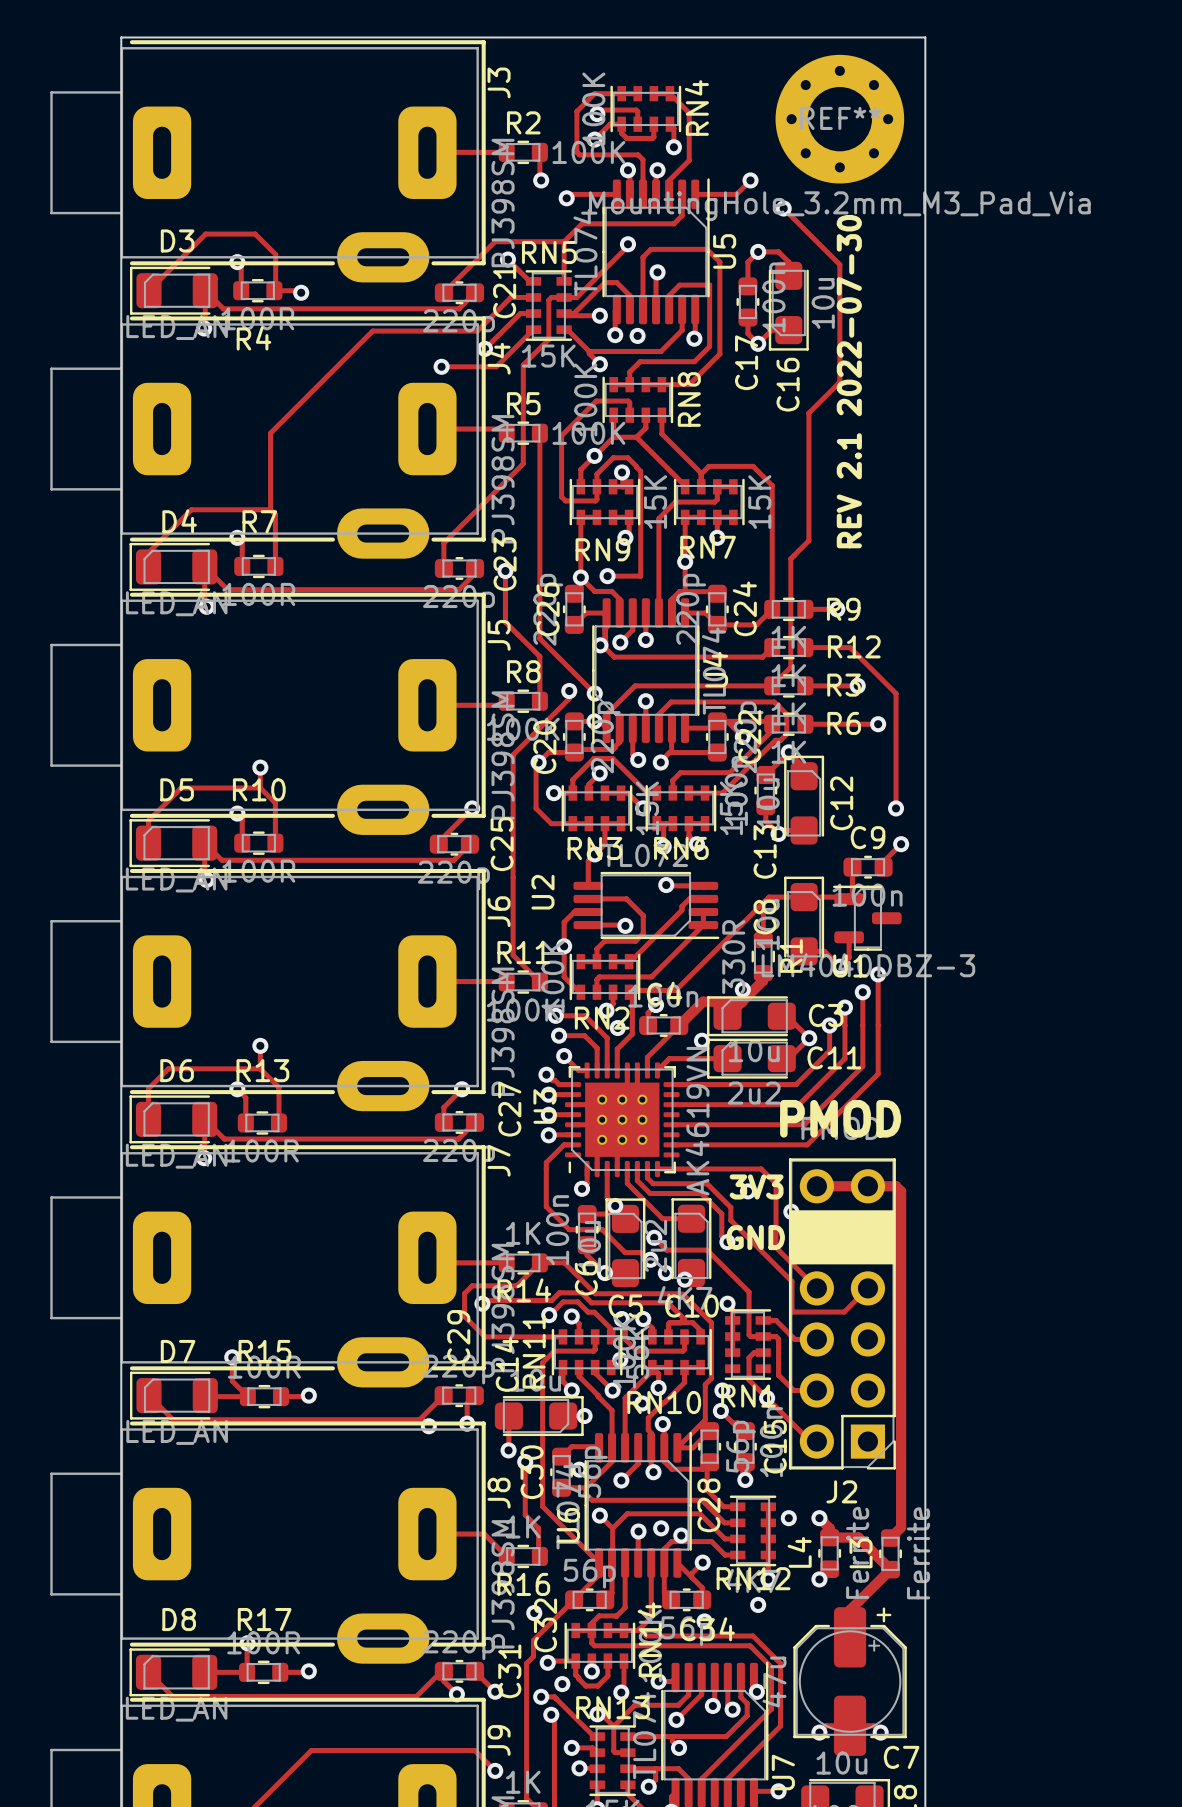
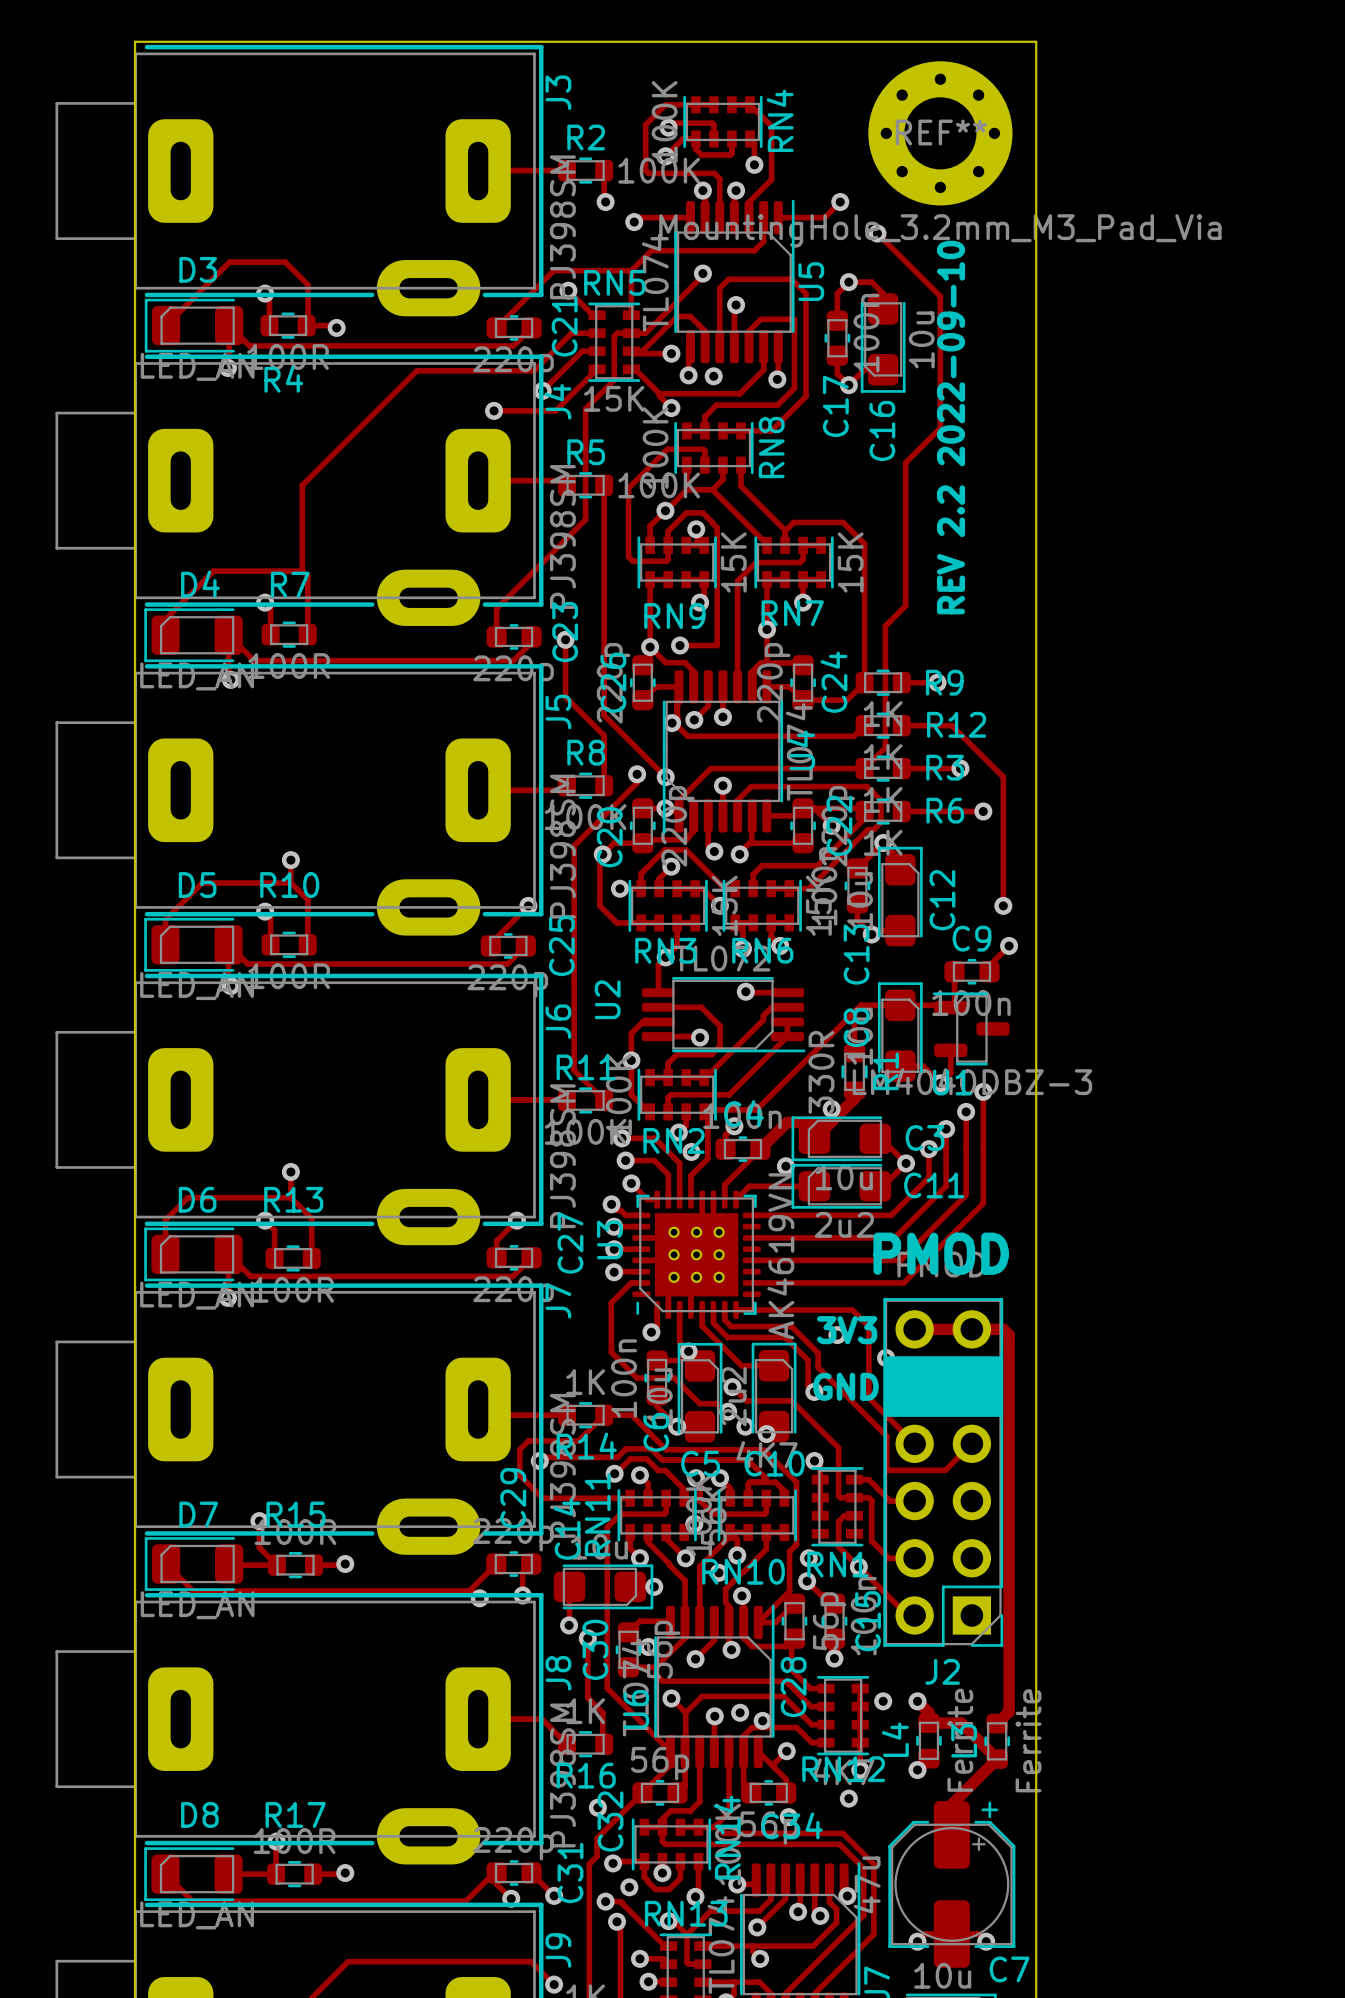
text: REV 2.1 2022-07-30 (849, 381) -> REV 2.2 2022-09-10 (951, 427)

